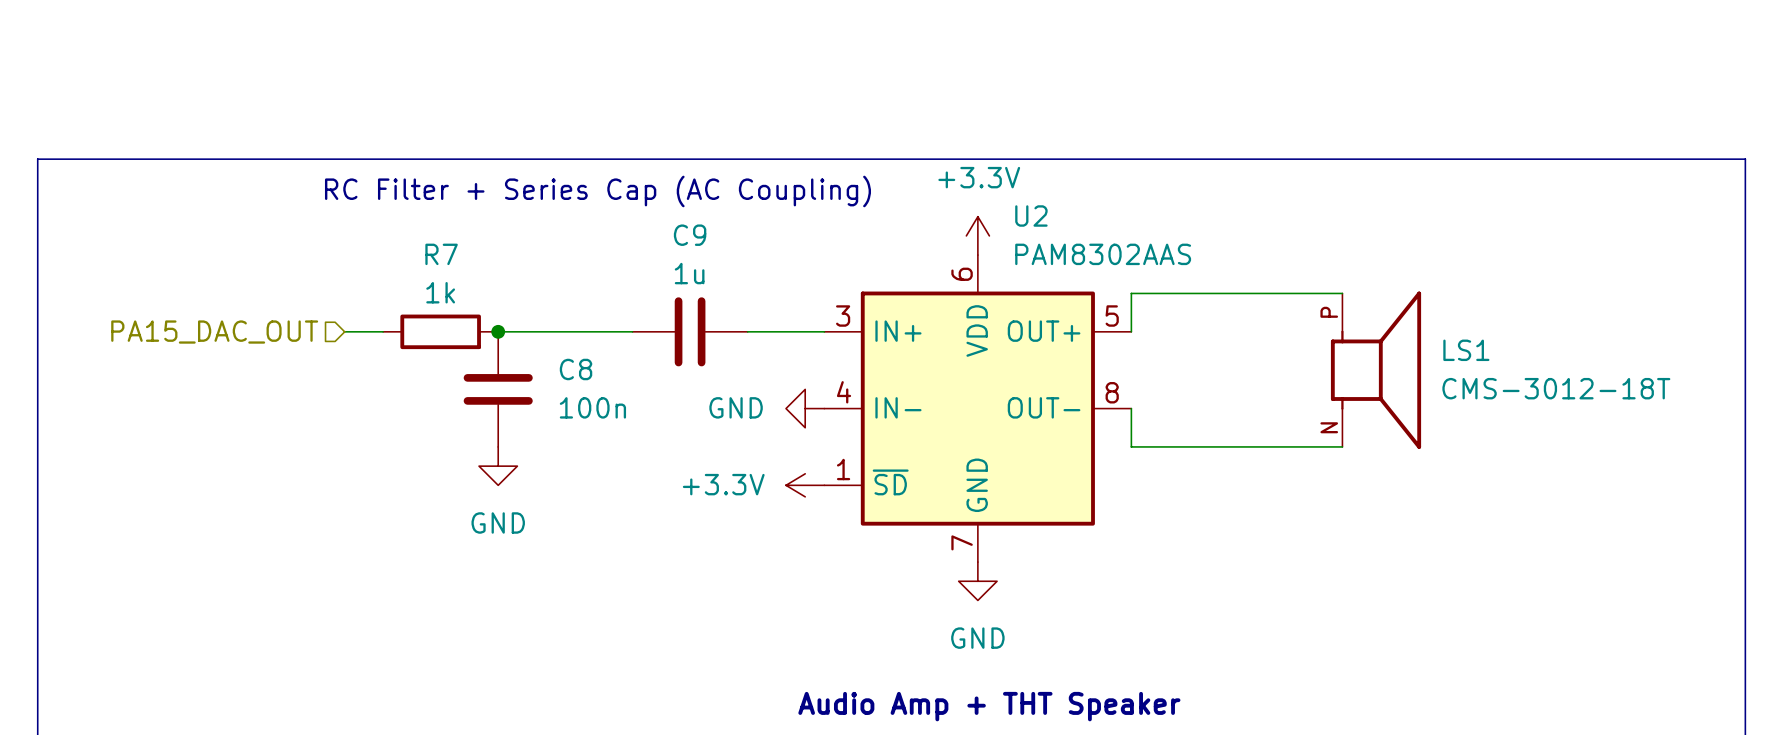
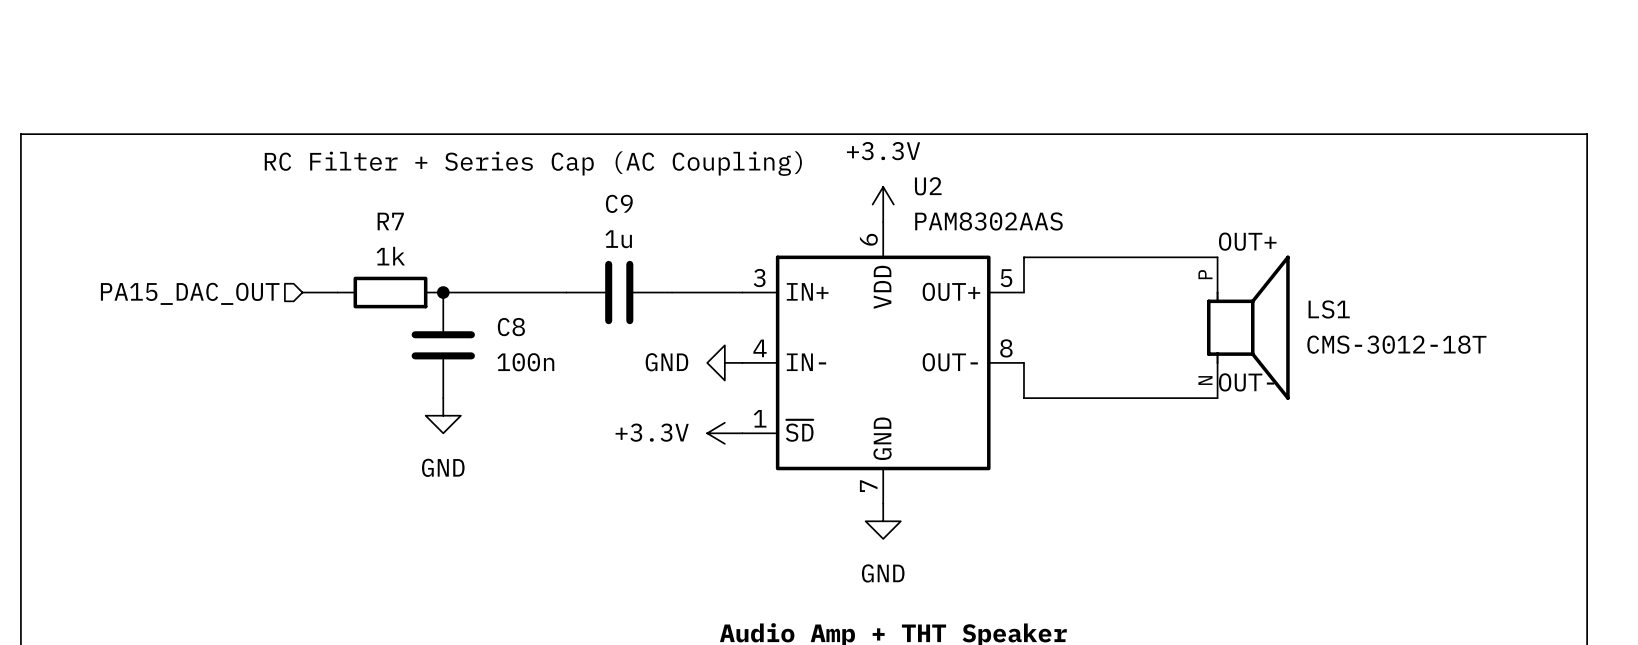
label: none -> OUT+ (1247, 241)
label: none -> OUT- (1246, 382)

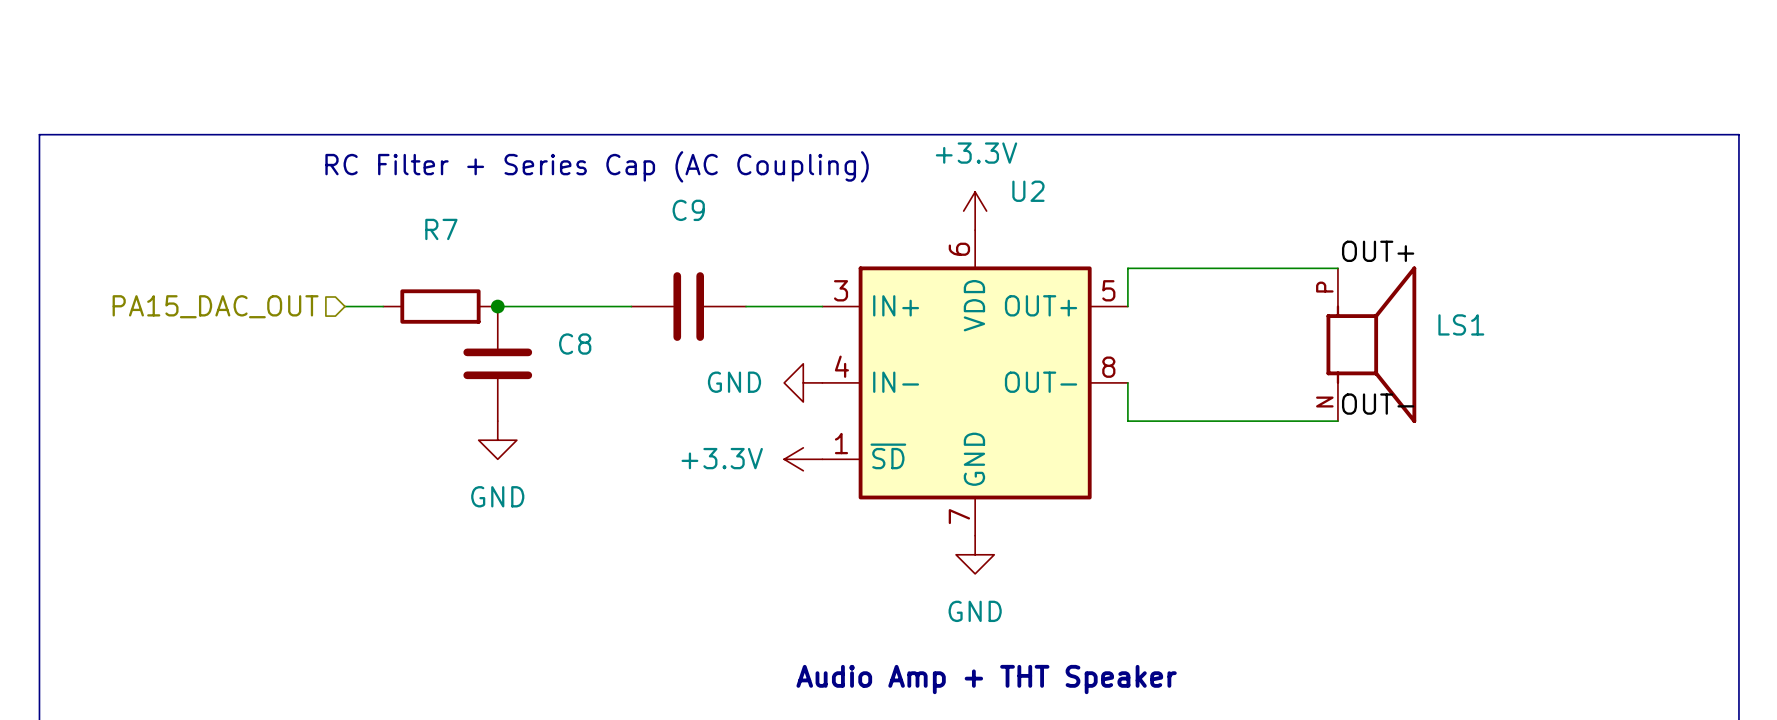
U2 value: PAM8302AAS (988, 221) -> none
C9 value: 1u (618, 239) -> none
R7 value: 1k (390, 256) -> none
LS1 value: CMS-3012-18T (1396, 344) -> none
C8 value: 100n (525, 362) -> none

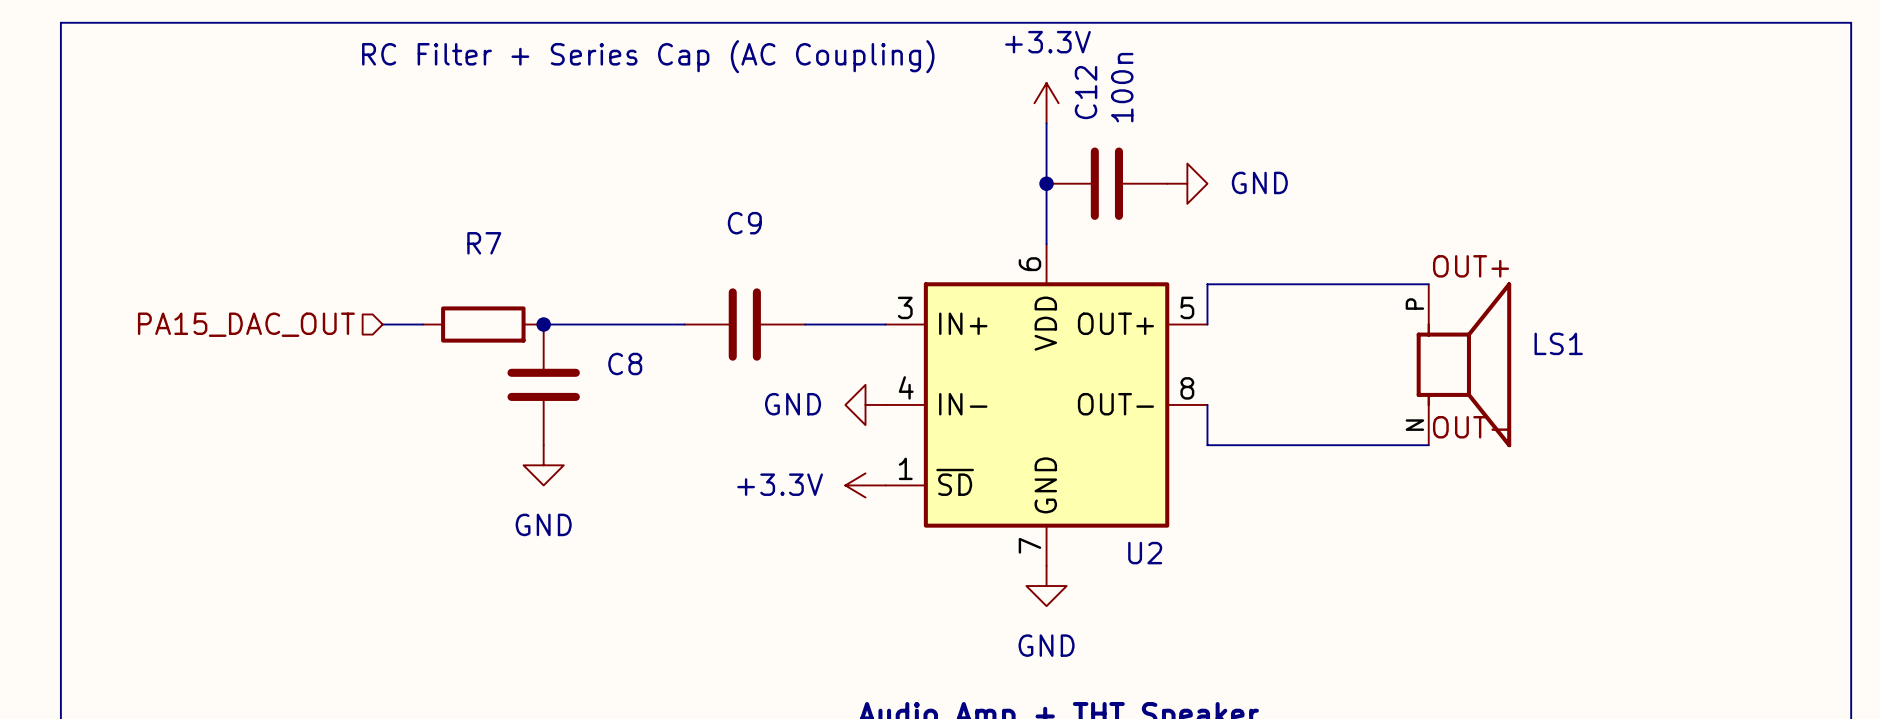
wire: none -> (1046, 123) (1046, 244)
line: (39, 134) (1738, 134) -> (60, 143) (60, 22) (1851, 22) (1851, 143)
text position: RC Filter + Series Cap (AC Coupling) (597, 166) -> RC Filter + Series Cap (AC Coupling) (648, 56)
junction: none -> (1046, 183)
C12: none -> 100n (1106, 183)
power symbol: none -> GND (1187, 183)
U2 name position: U2 (1028, 191) -> U2 (1145, 553)
power symbol position: +3.3V (975, 211) -> +3.3V (1046, 103)

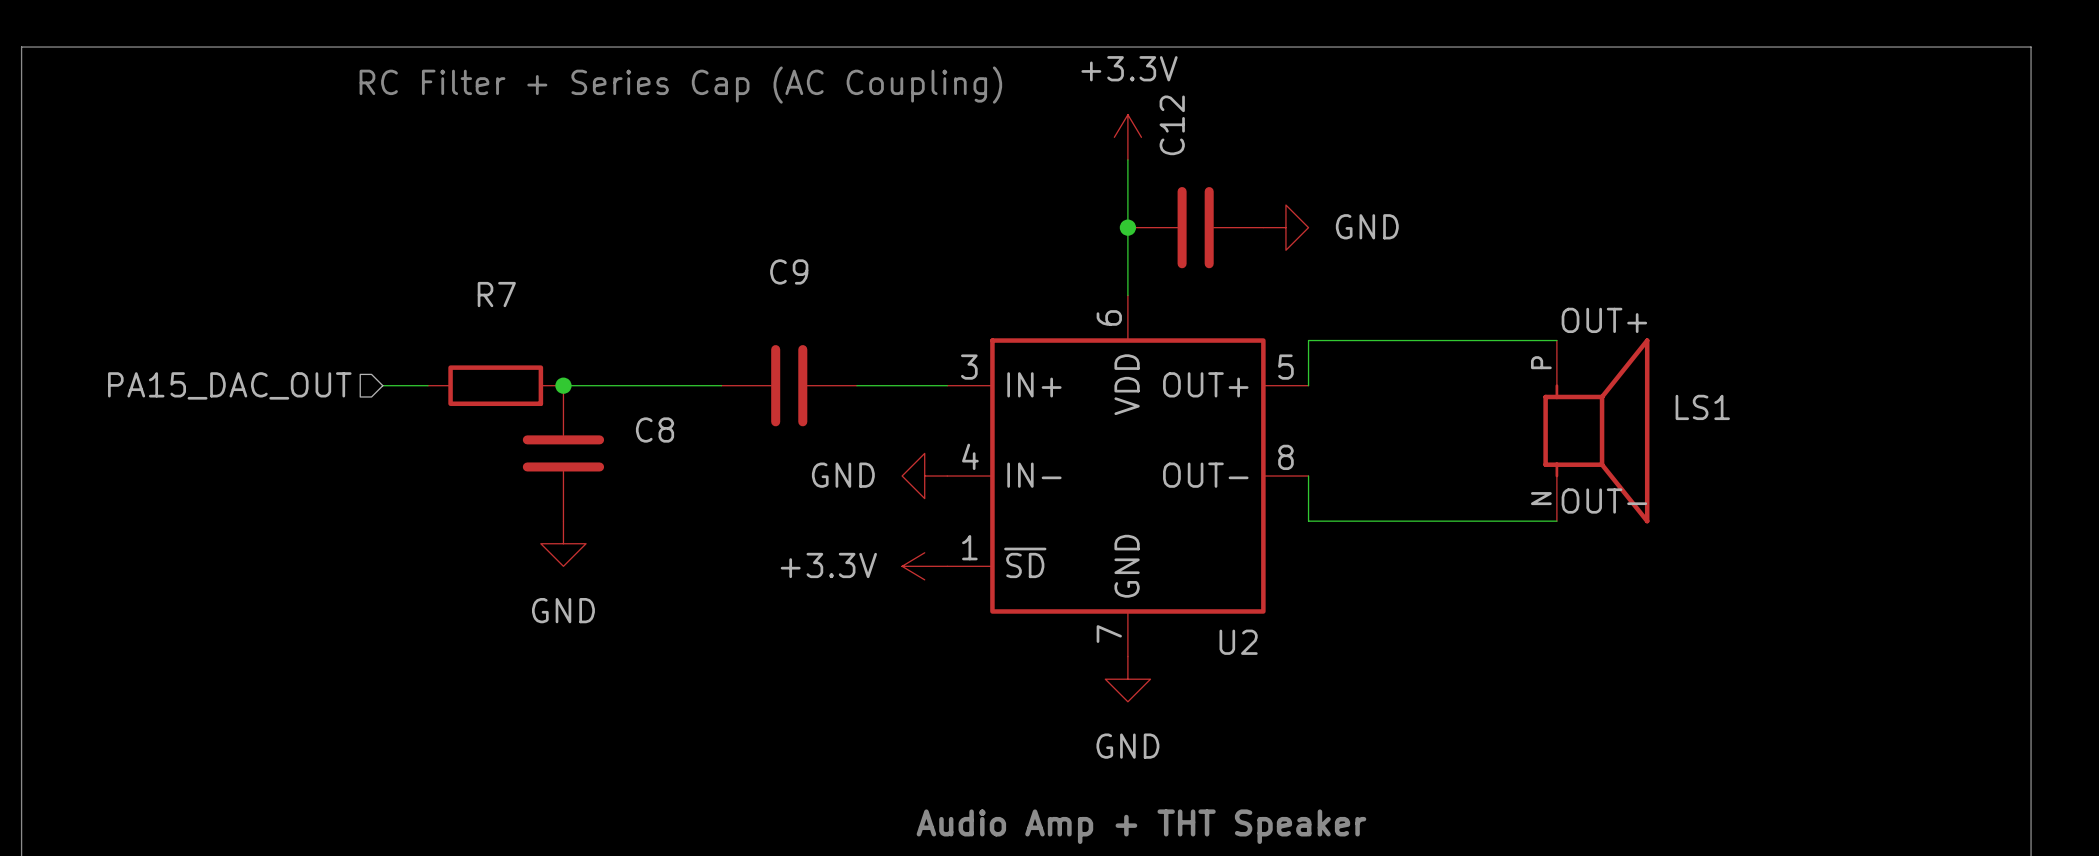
C12 value: 100n (1122, 87) -> none

